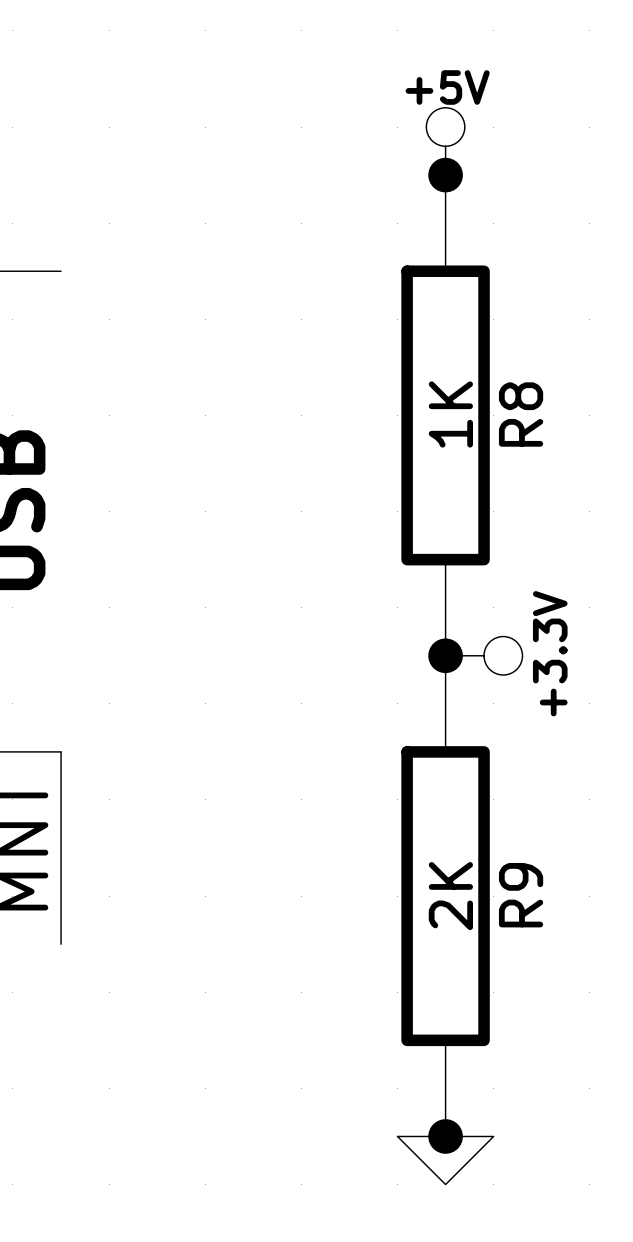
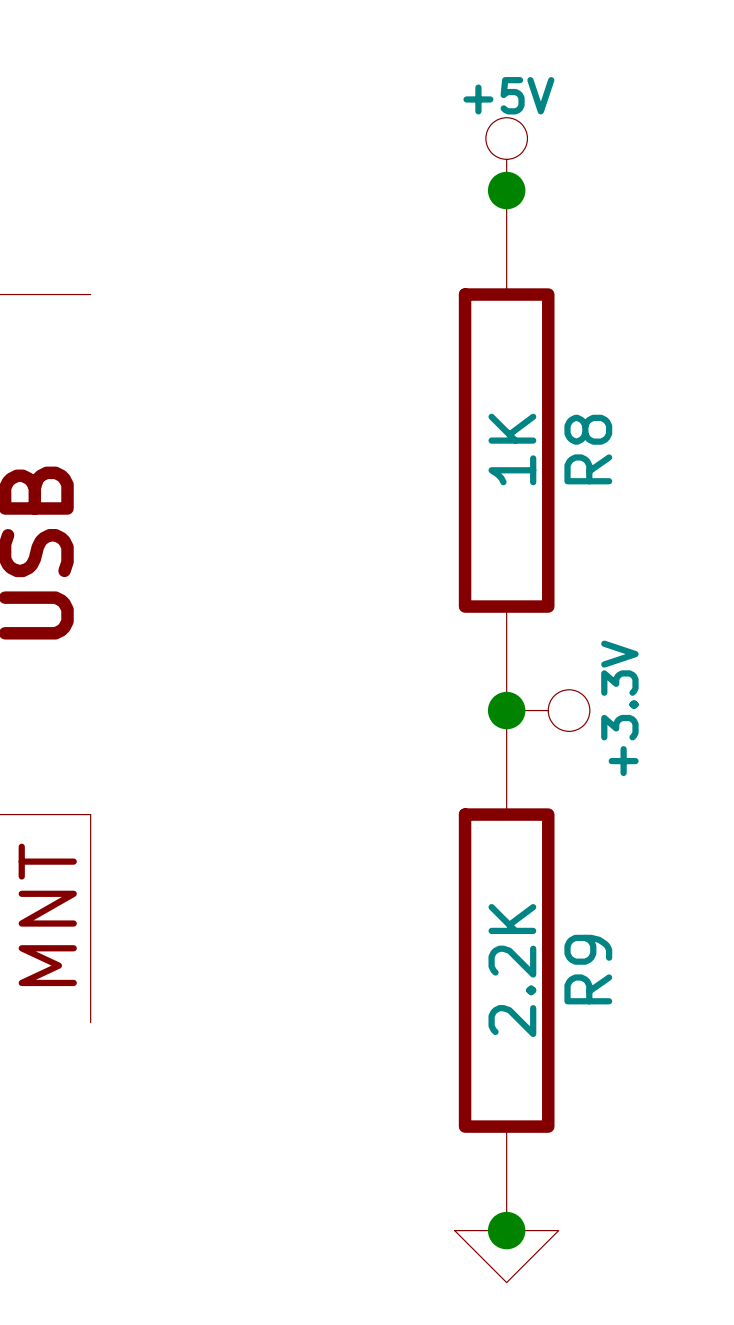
R9 value: 2K (450, 896) -> 2.2K (512, 970)

